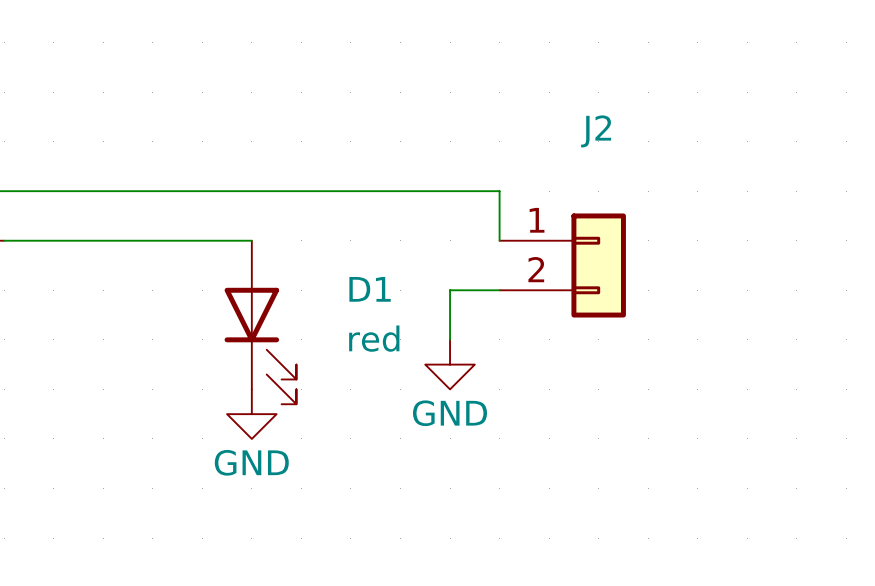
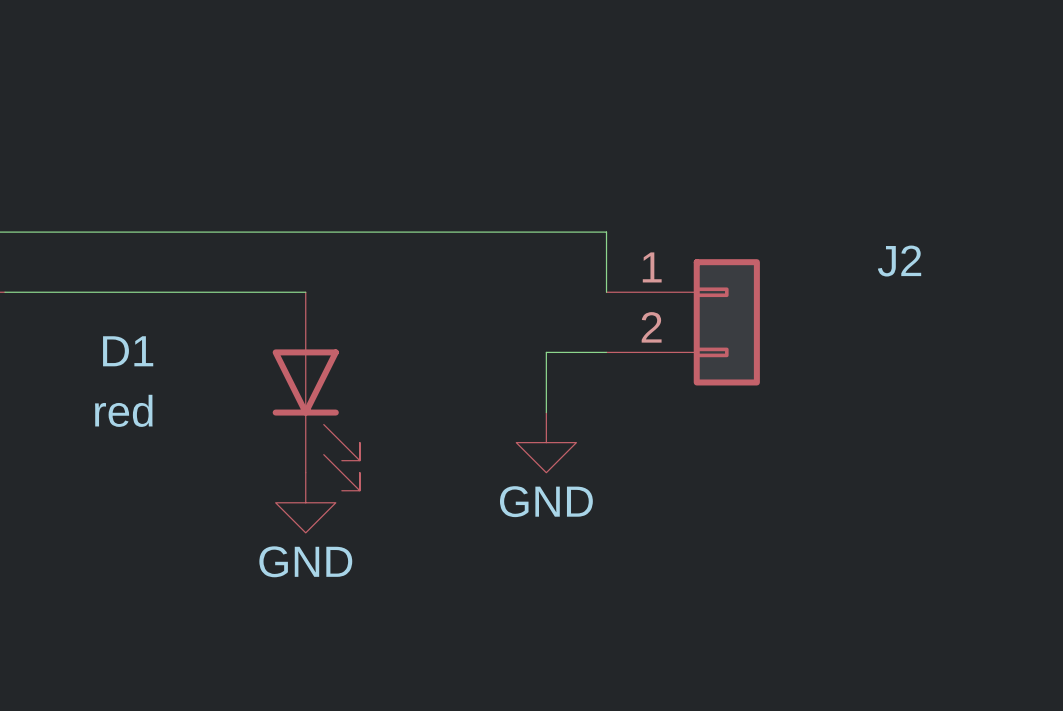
J2 name position: J2 (596, 131) -> J2 (899, 261)
D1 name position: D1 (370, 289) -> D1 (128, 351)
D1 value position: red (374, 338) -> red (123, 410)

